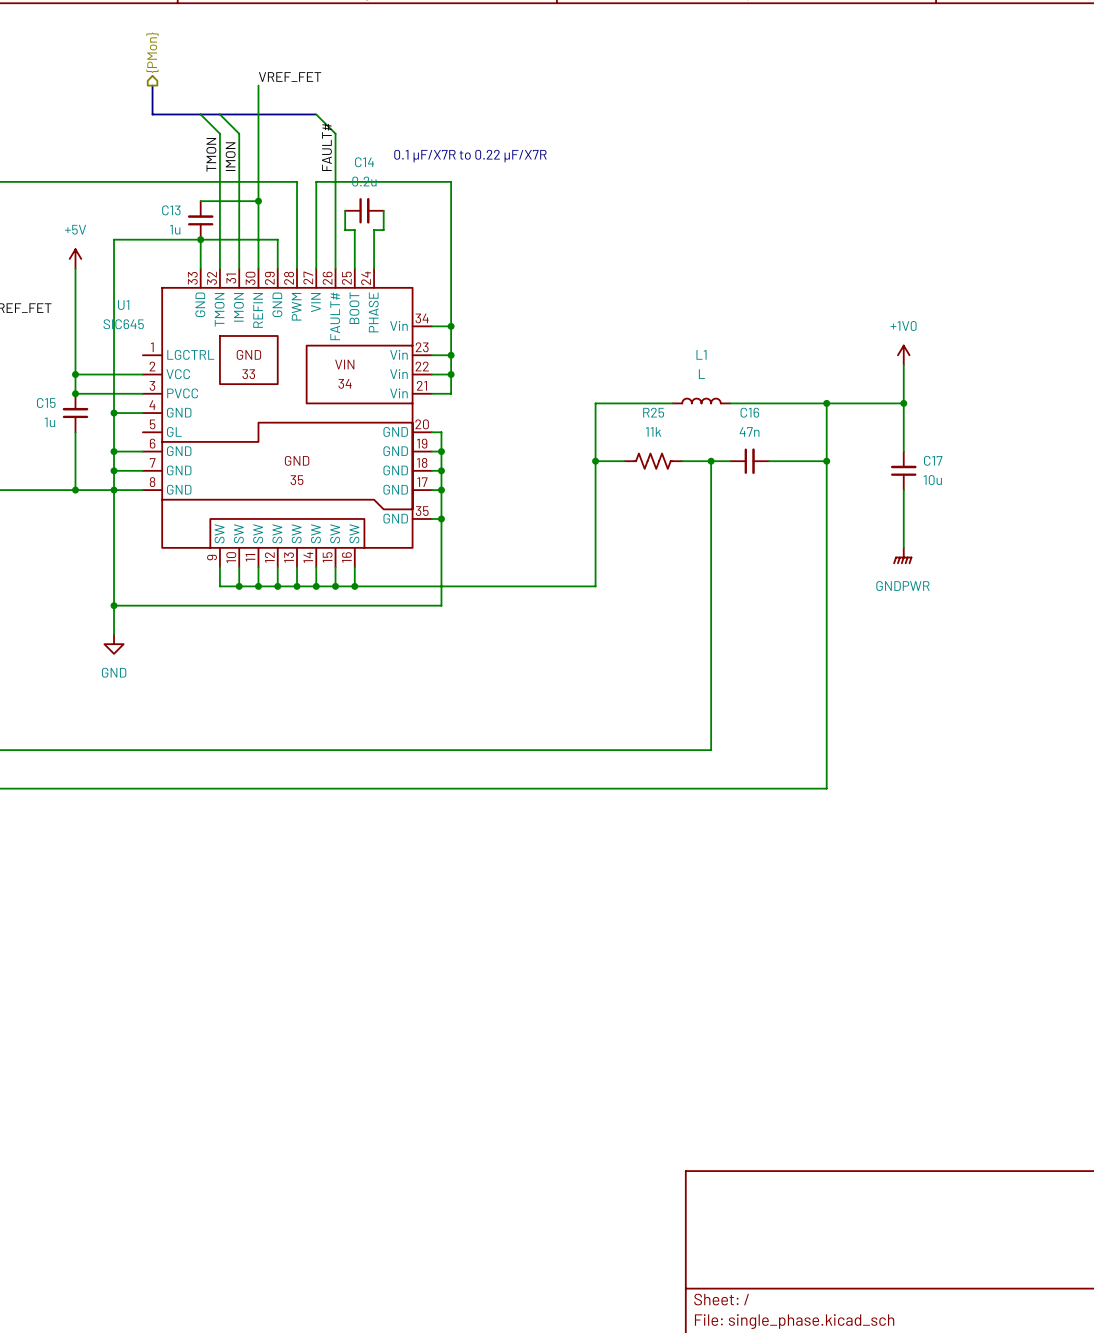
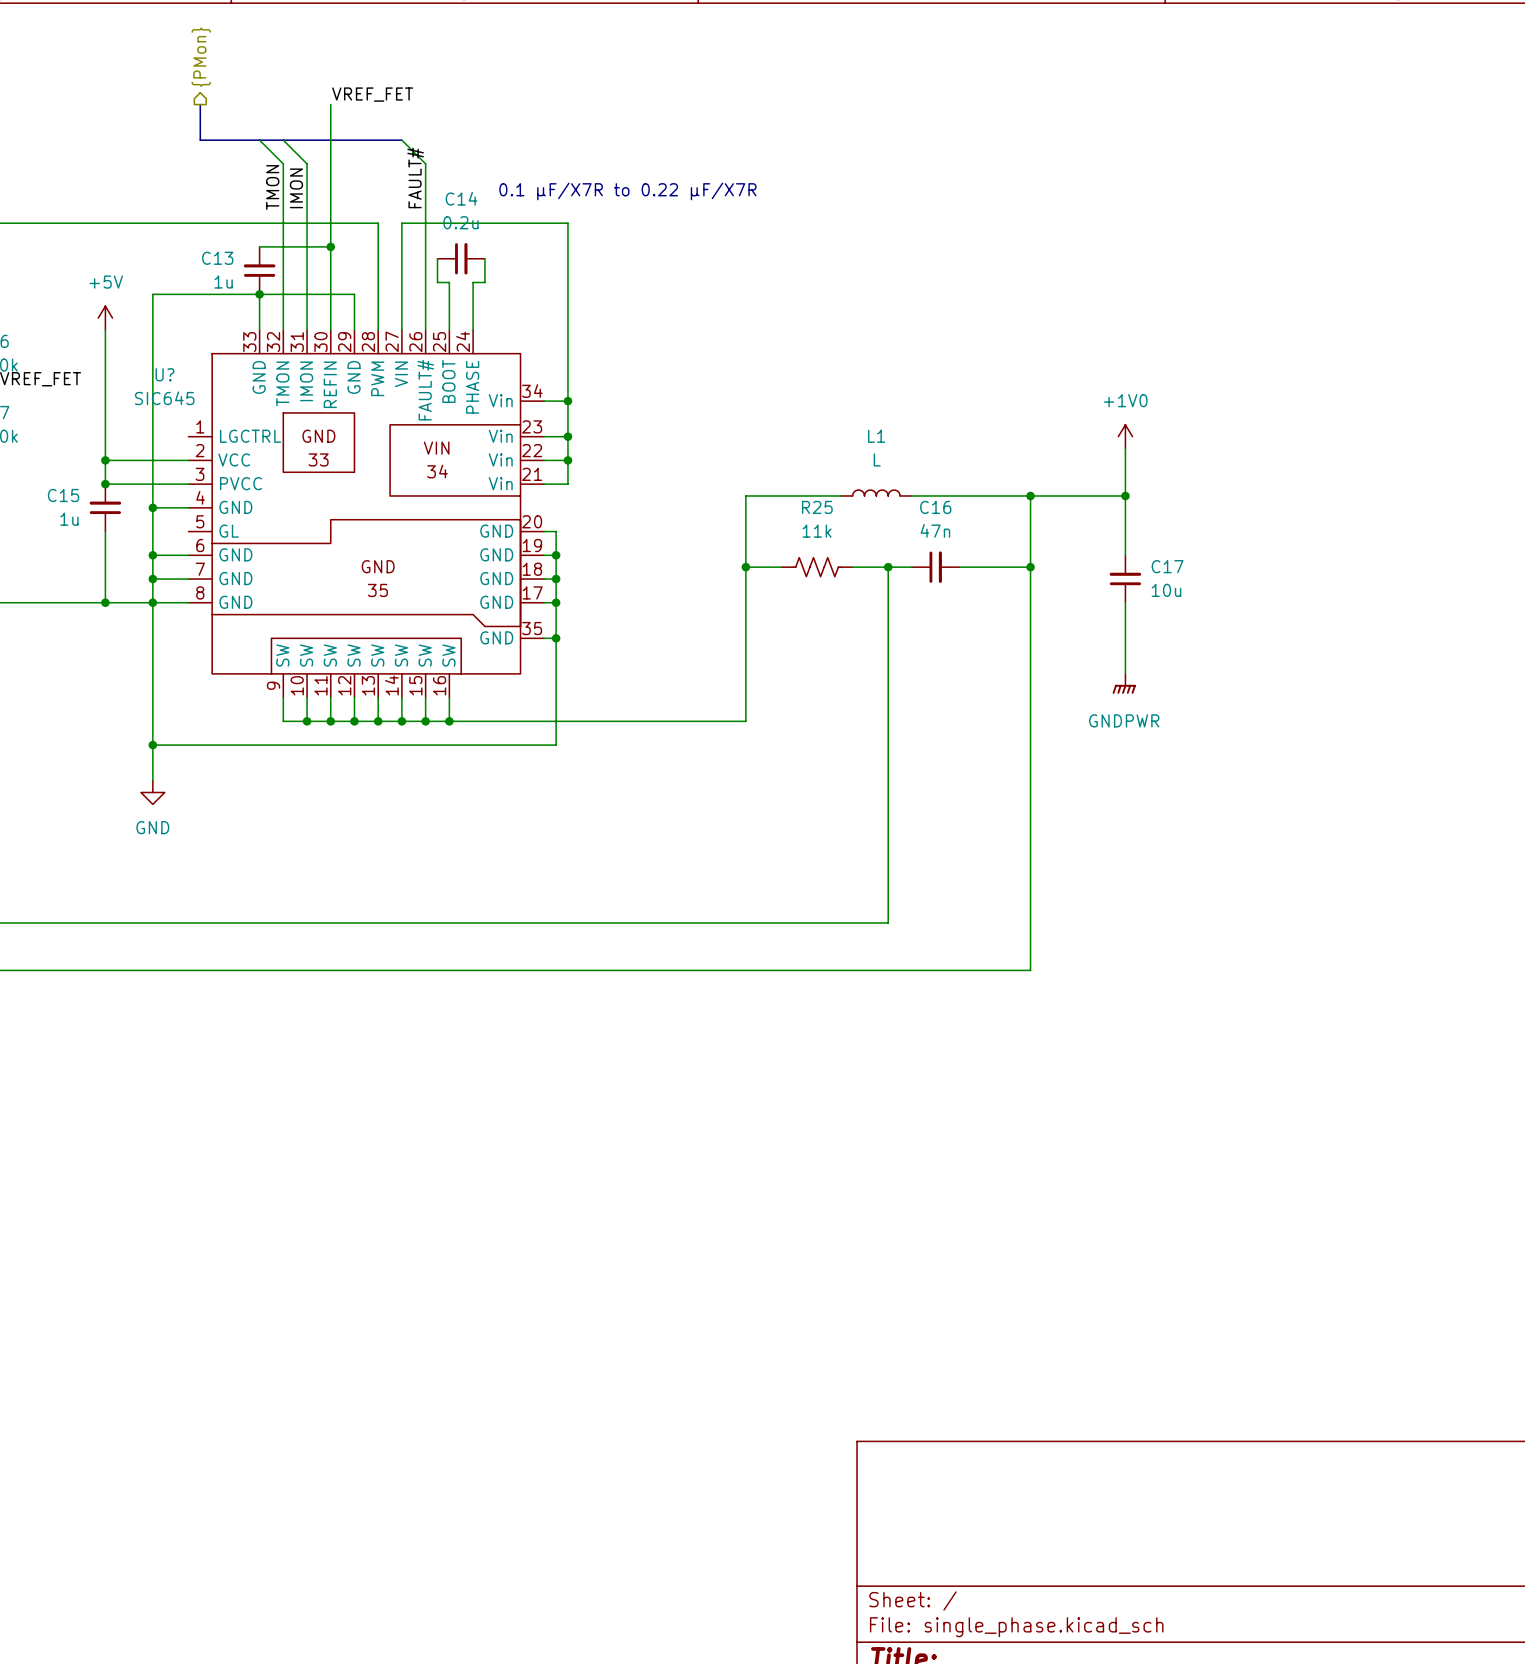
U1 name: U1 (123, 305) -> U? (164, 374)

